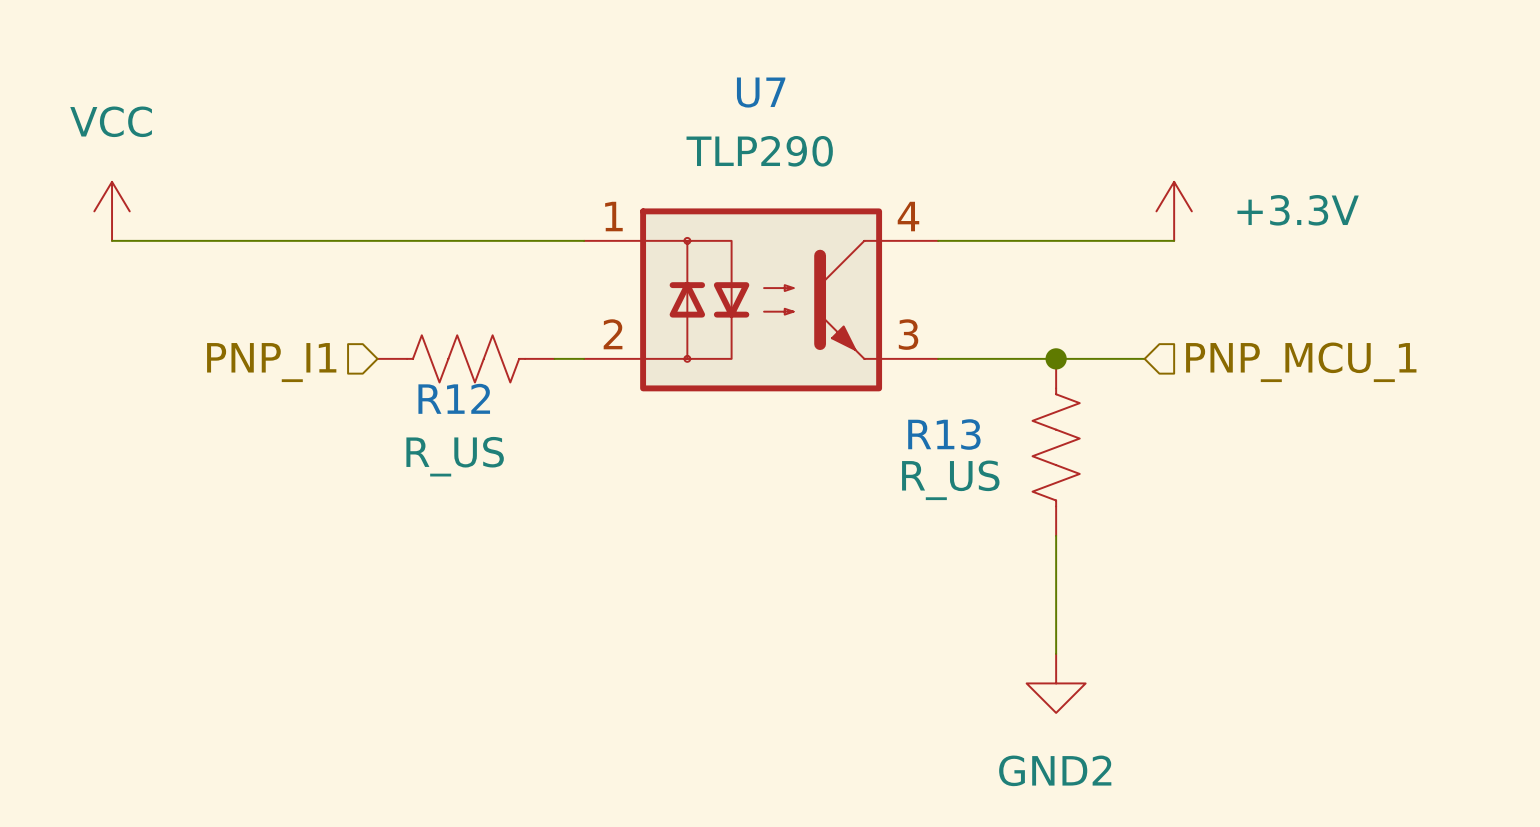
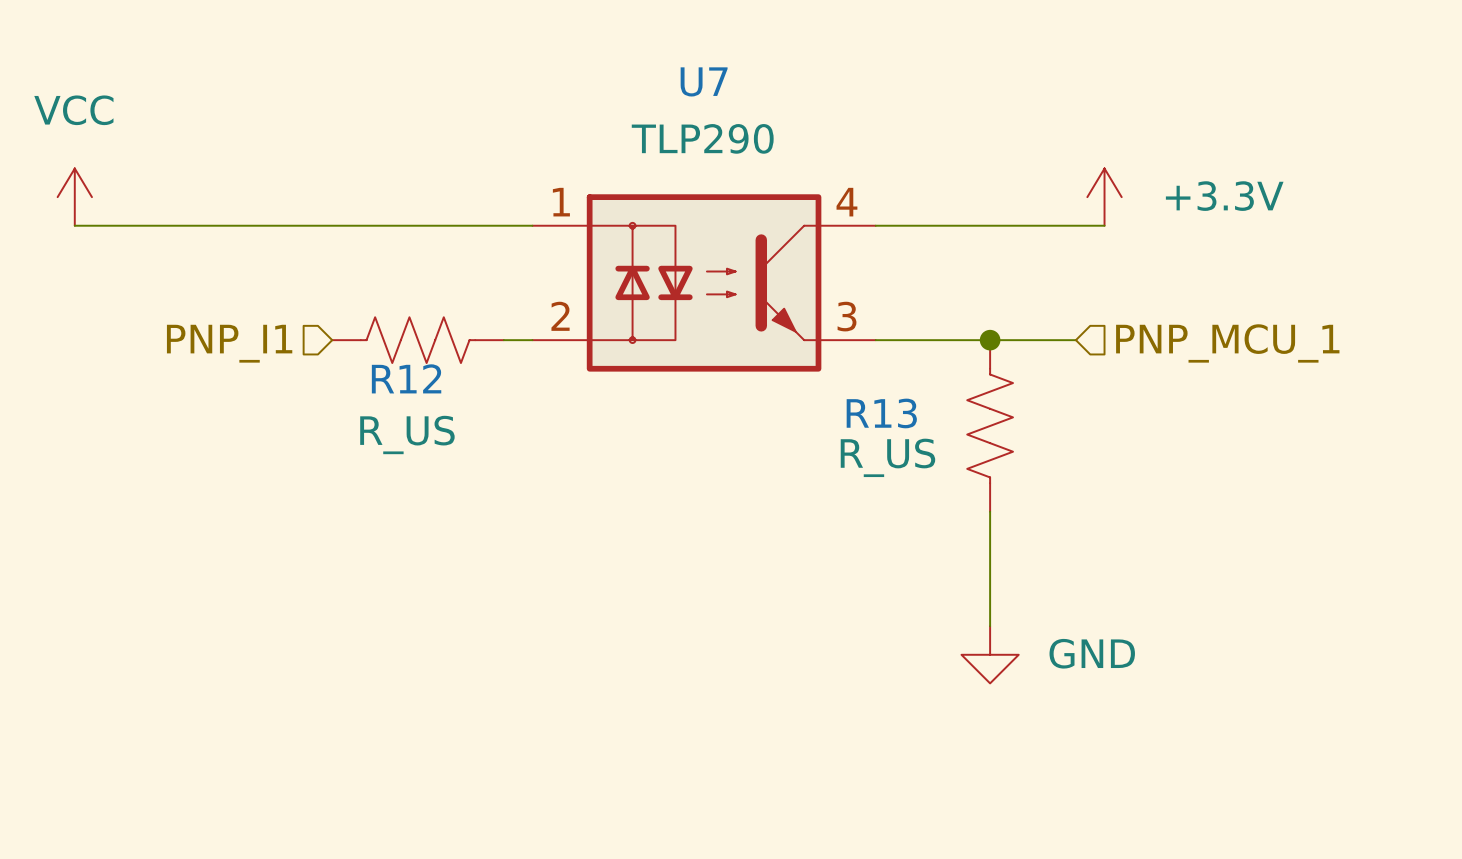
power symbol: GND2 (1056, 683) -> GND (990, 654)

